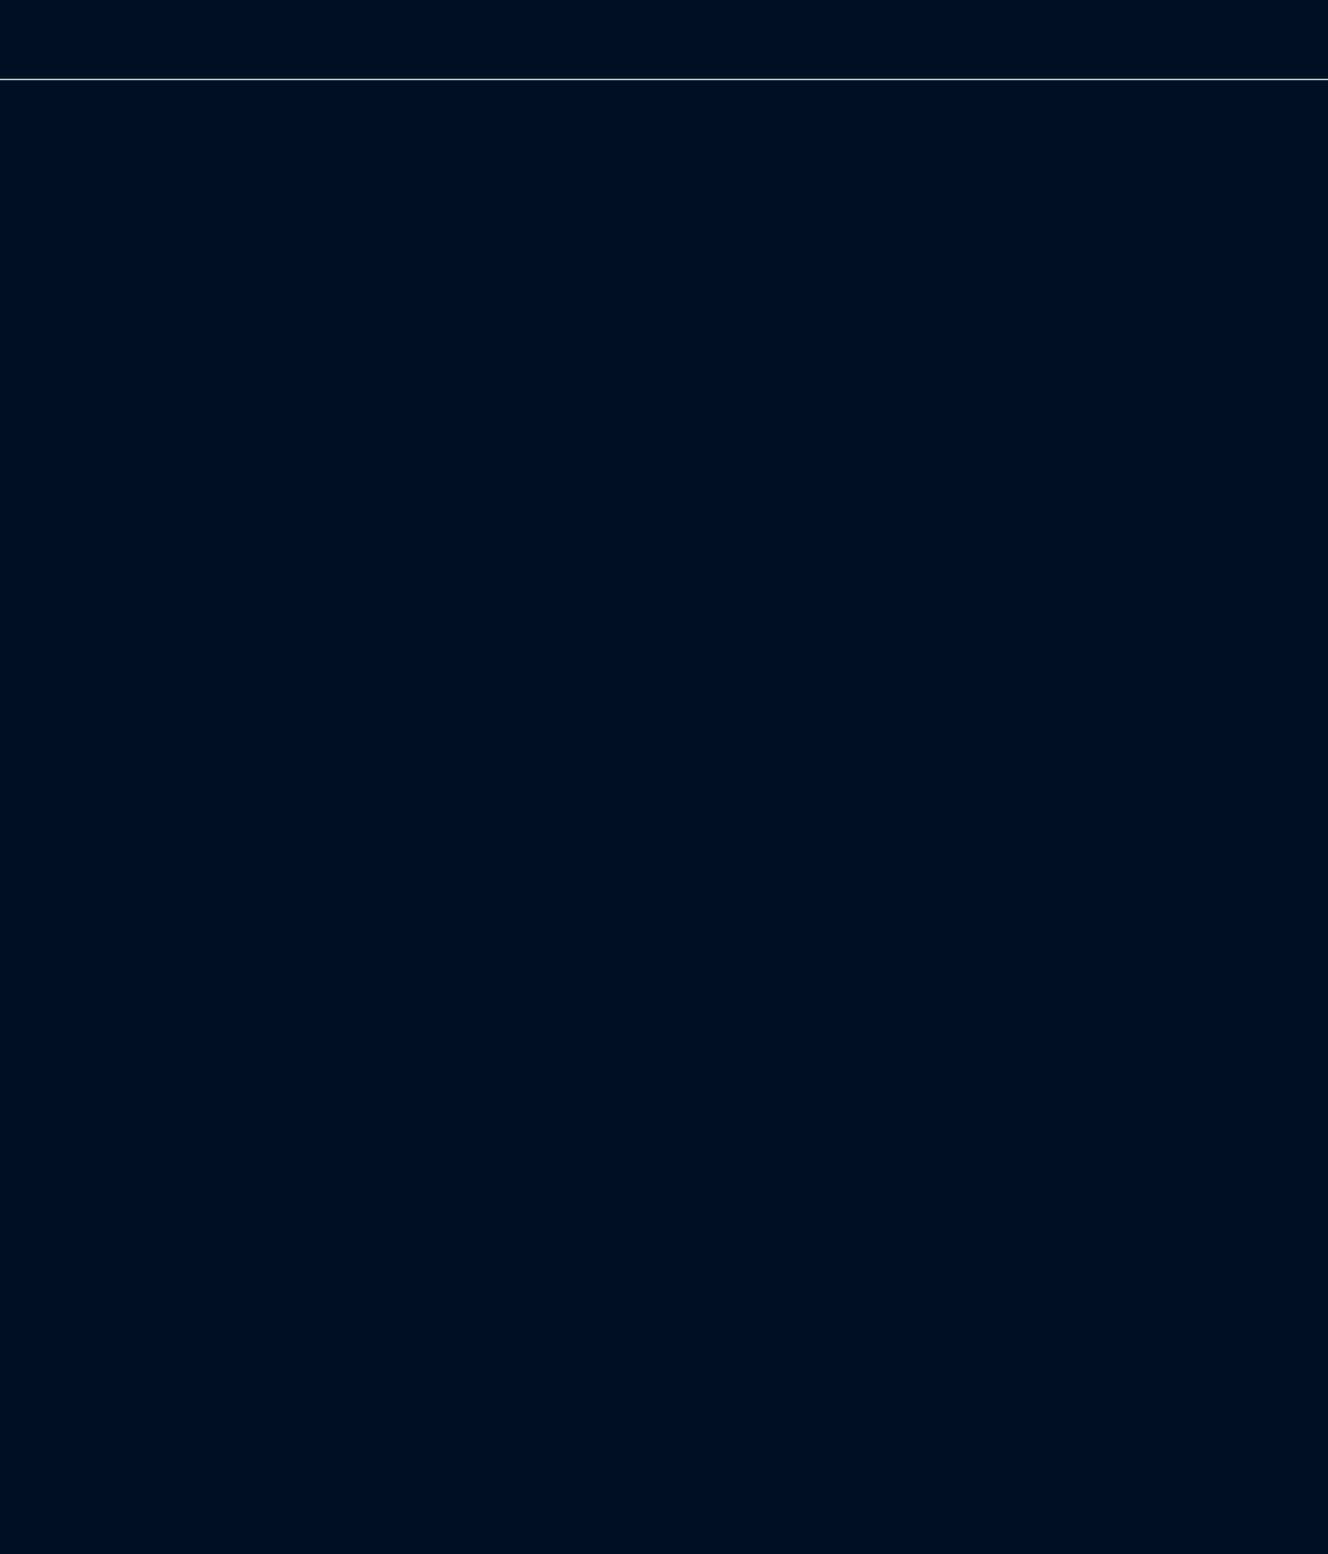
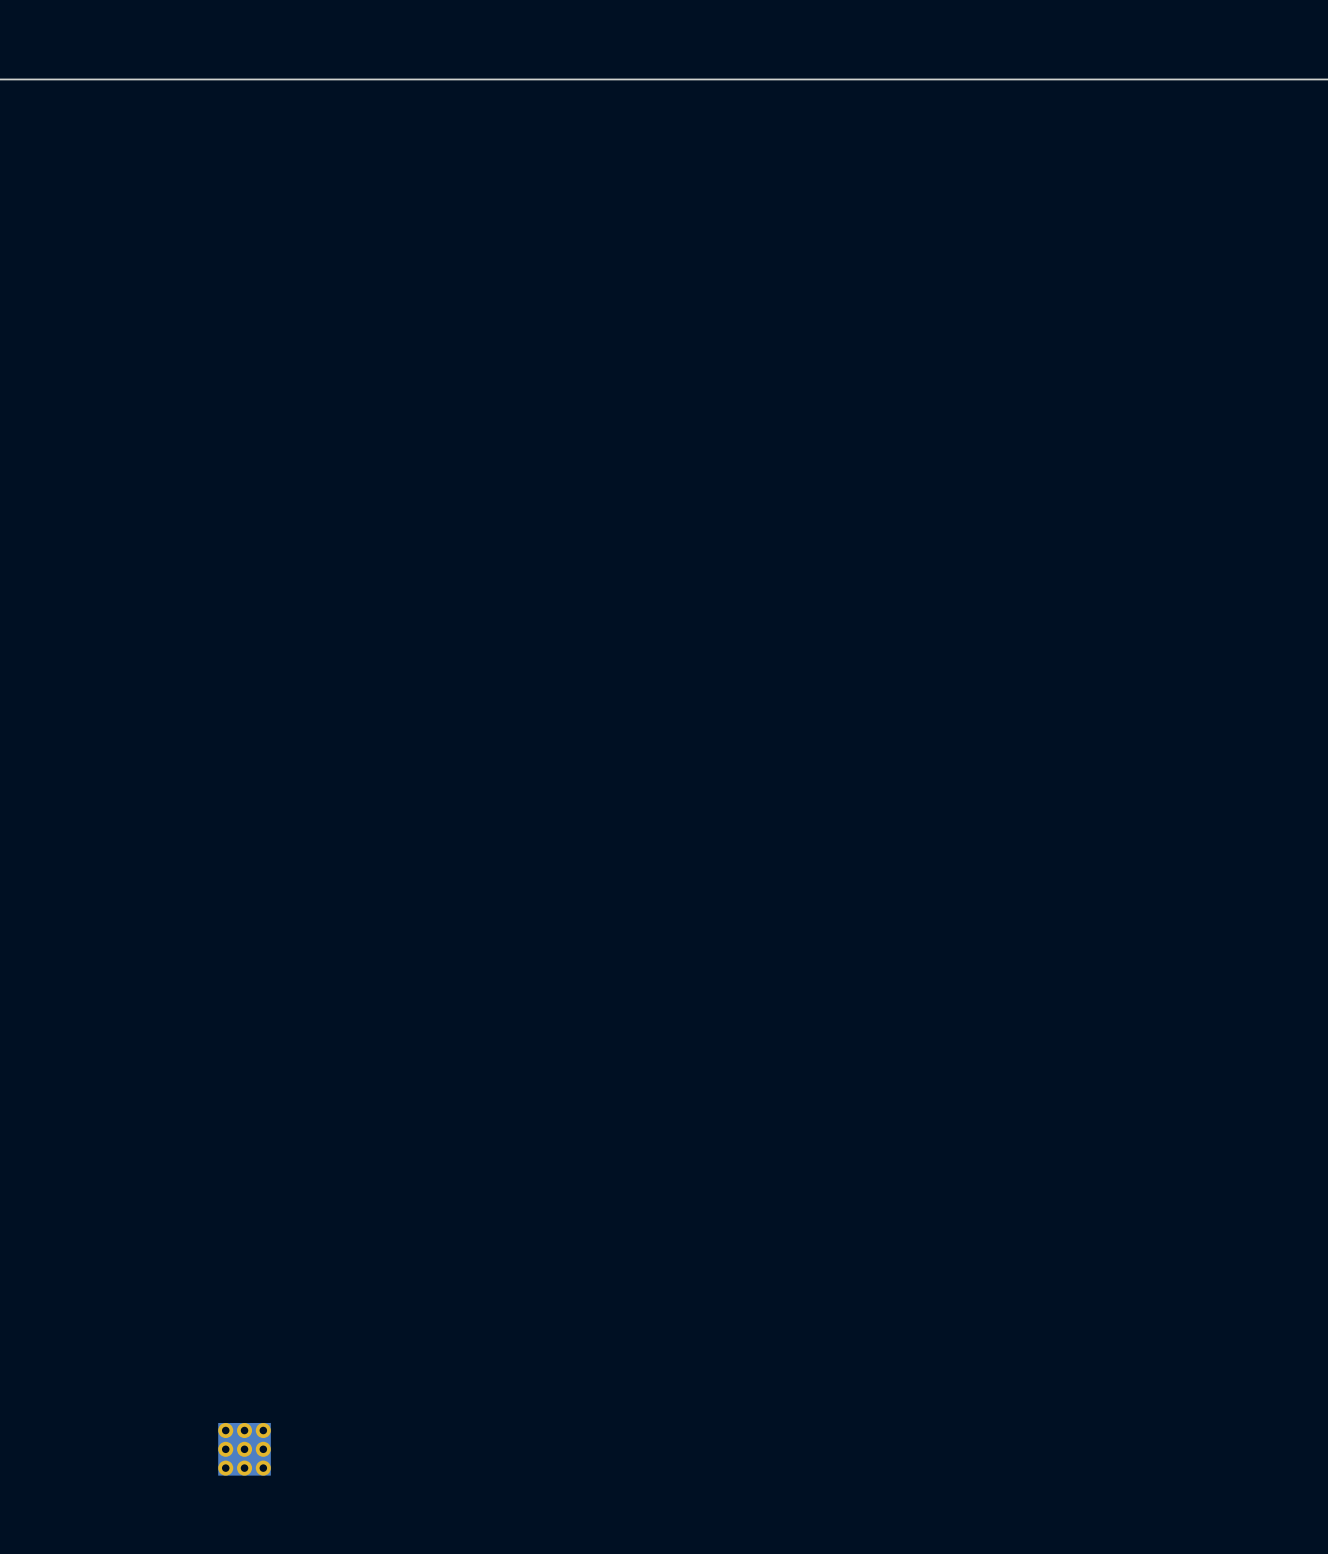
part: none -> (244, 1449)

